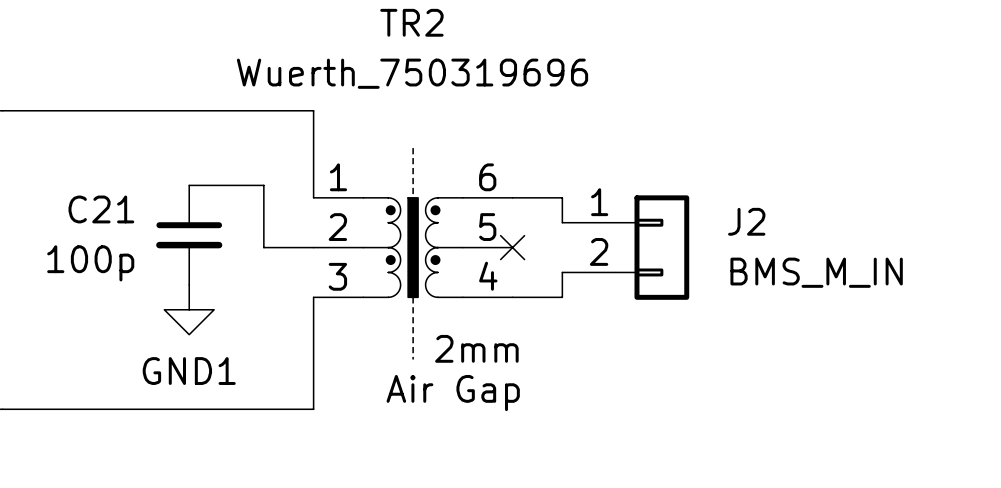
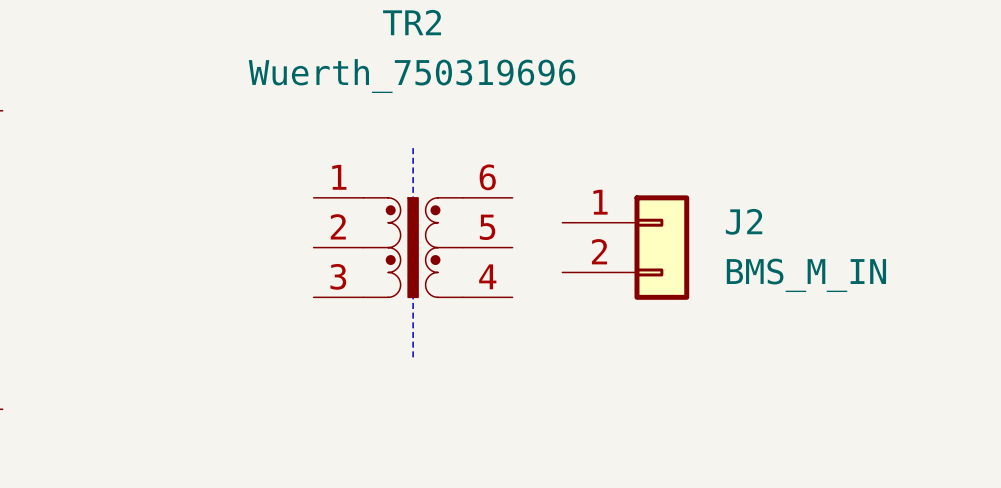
wire: (2, 110) (313, 110) (313, 197) -> none
wire: (189, 185) (263, 185) (263, 247) (313, 247) -> none
wire: (512, 197) (562, 197) (562, 222) -> none
C21: 100p (189, 235) -> none
no-connect mark: (512, 247) -> none
wire: (562, 272) (562, 297) (512, 297) -> none
wire: (313, 297) (313, 409) (2, 409) -> none
power symbol: GND1 (189, 309) -> none
text: 2mm (476, 348) -> none
text: Air Gap (453, 393) -> none

